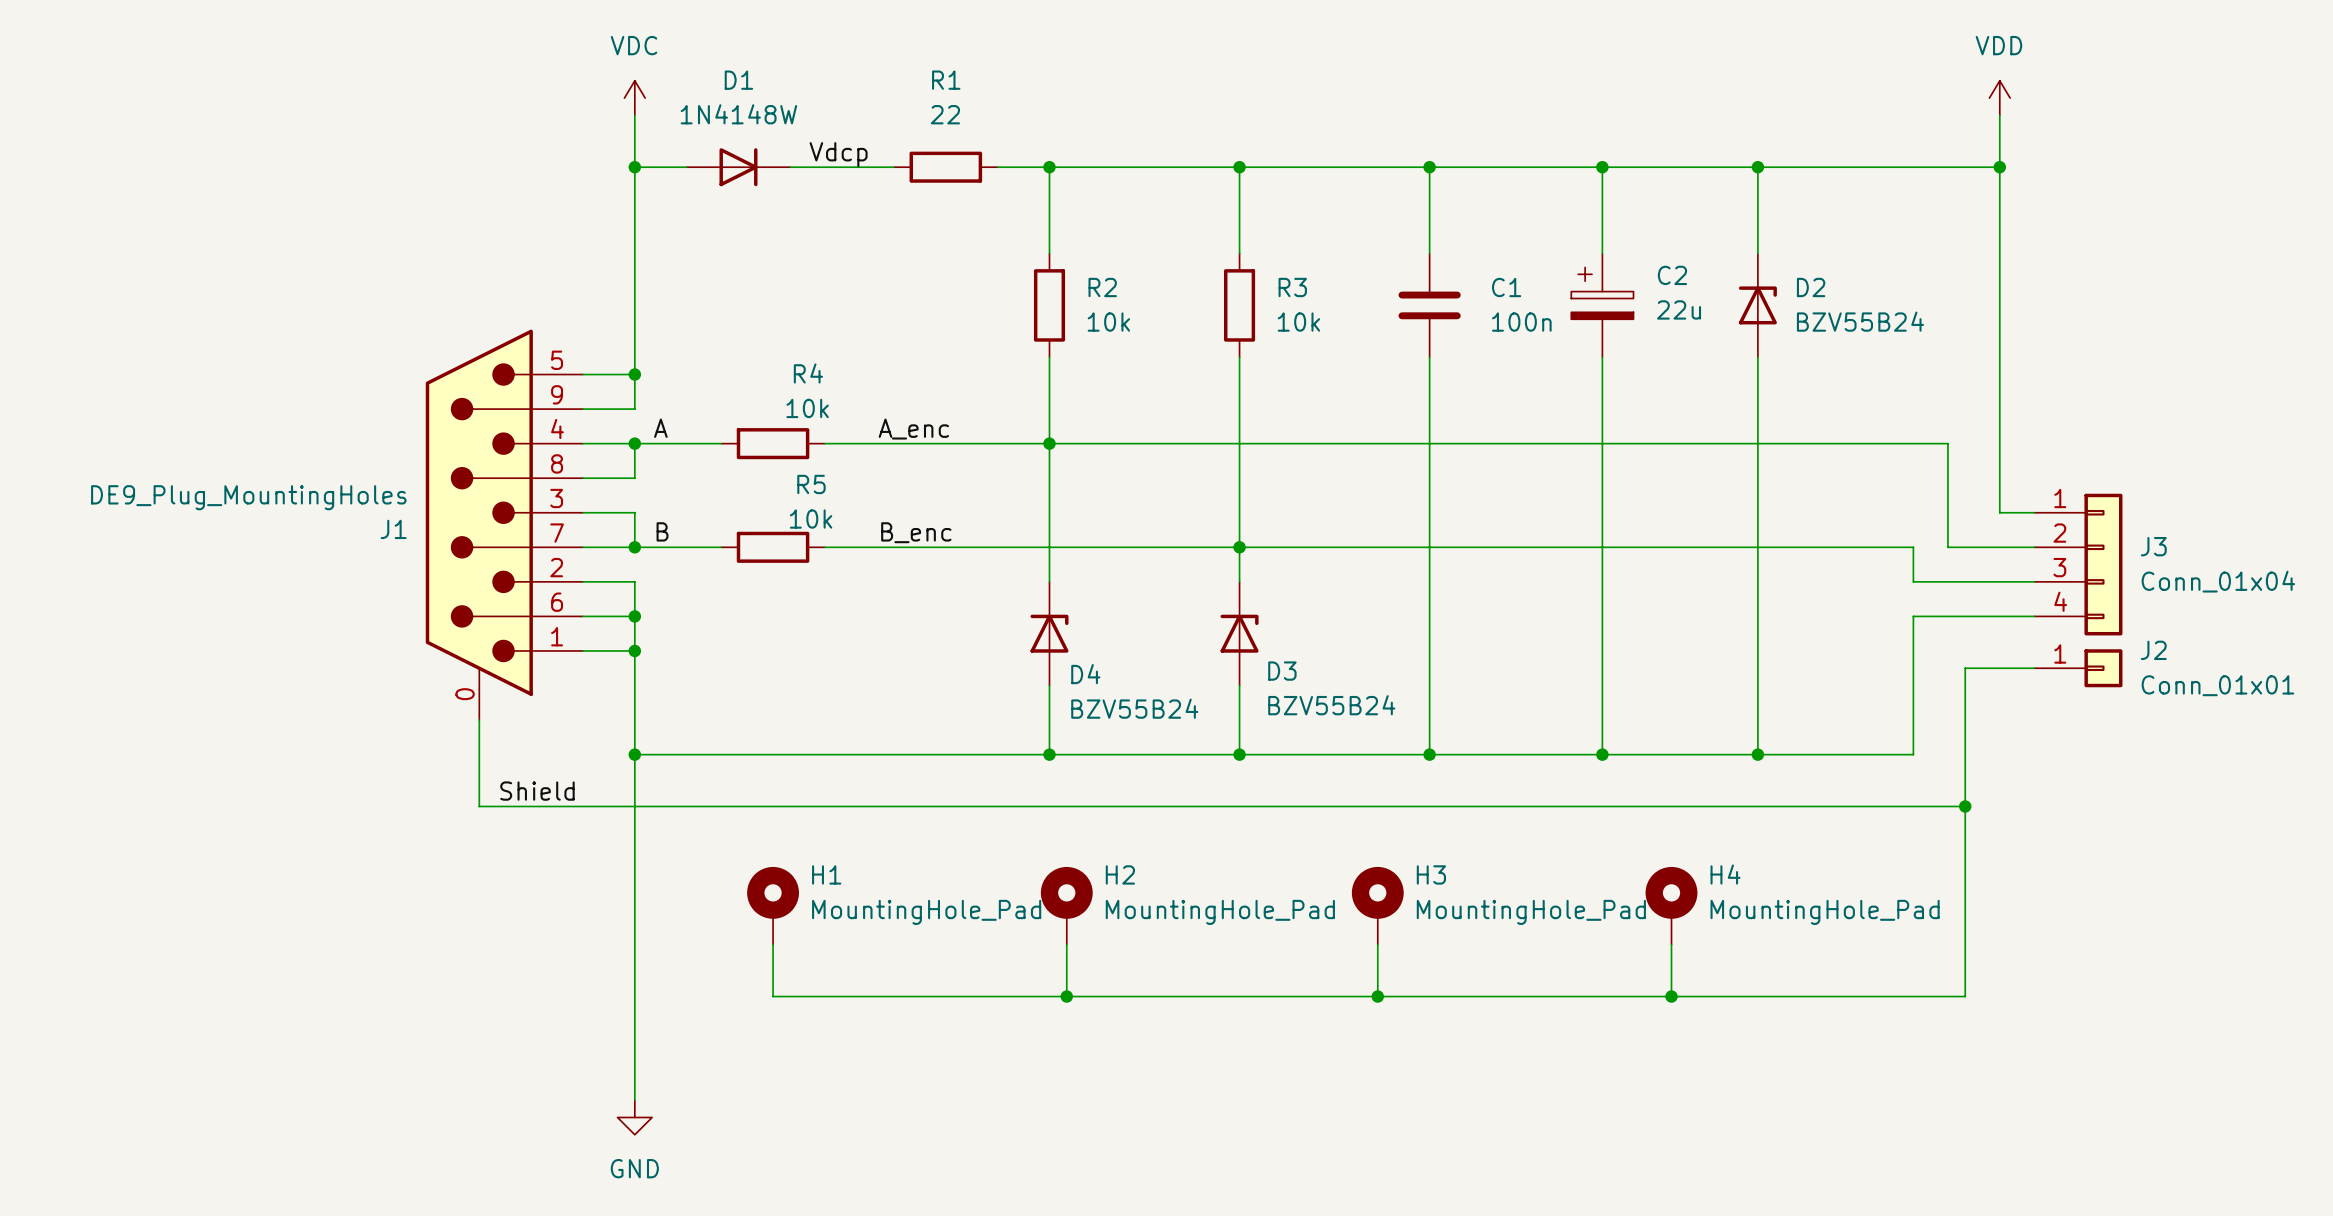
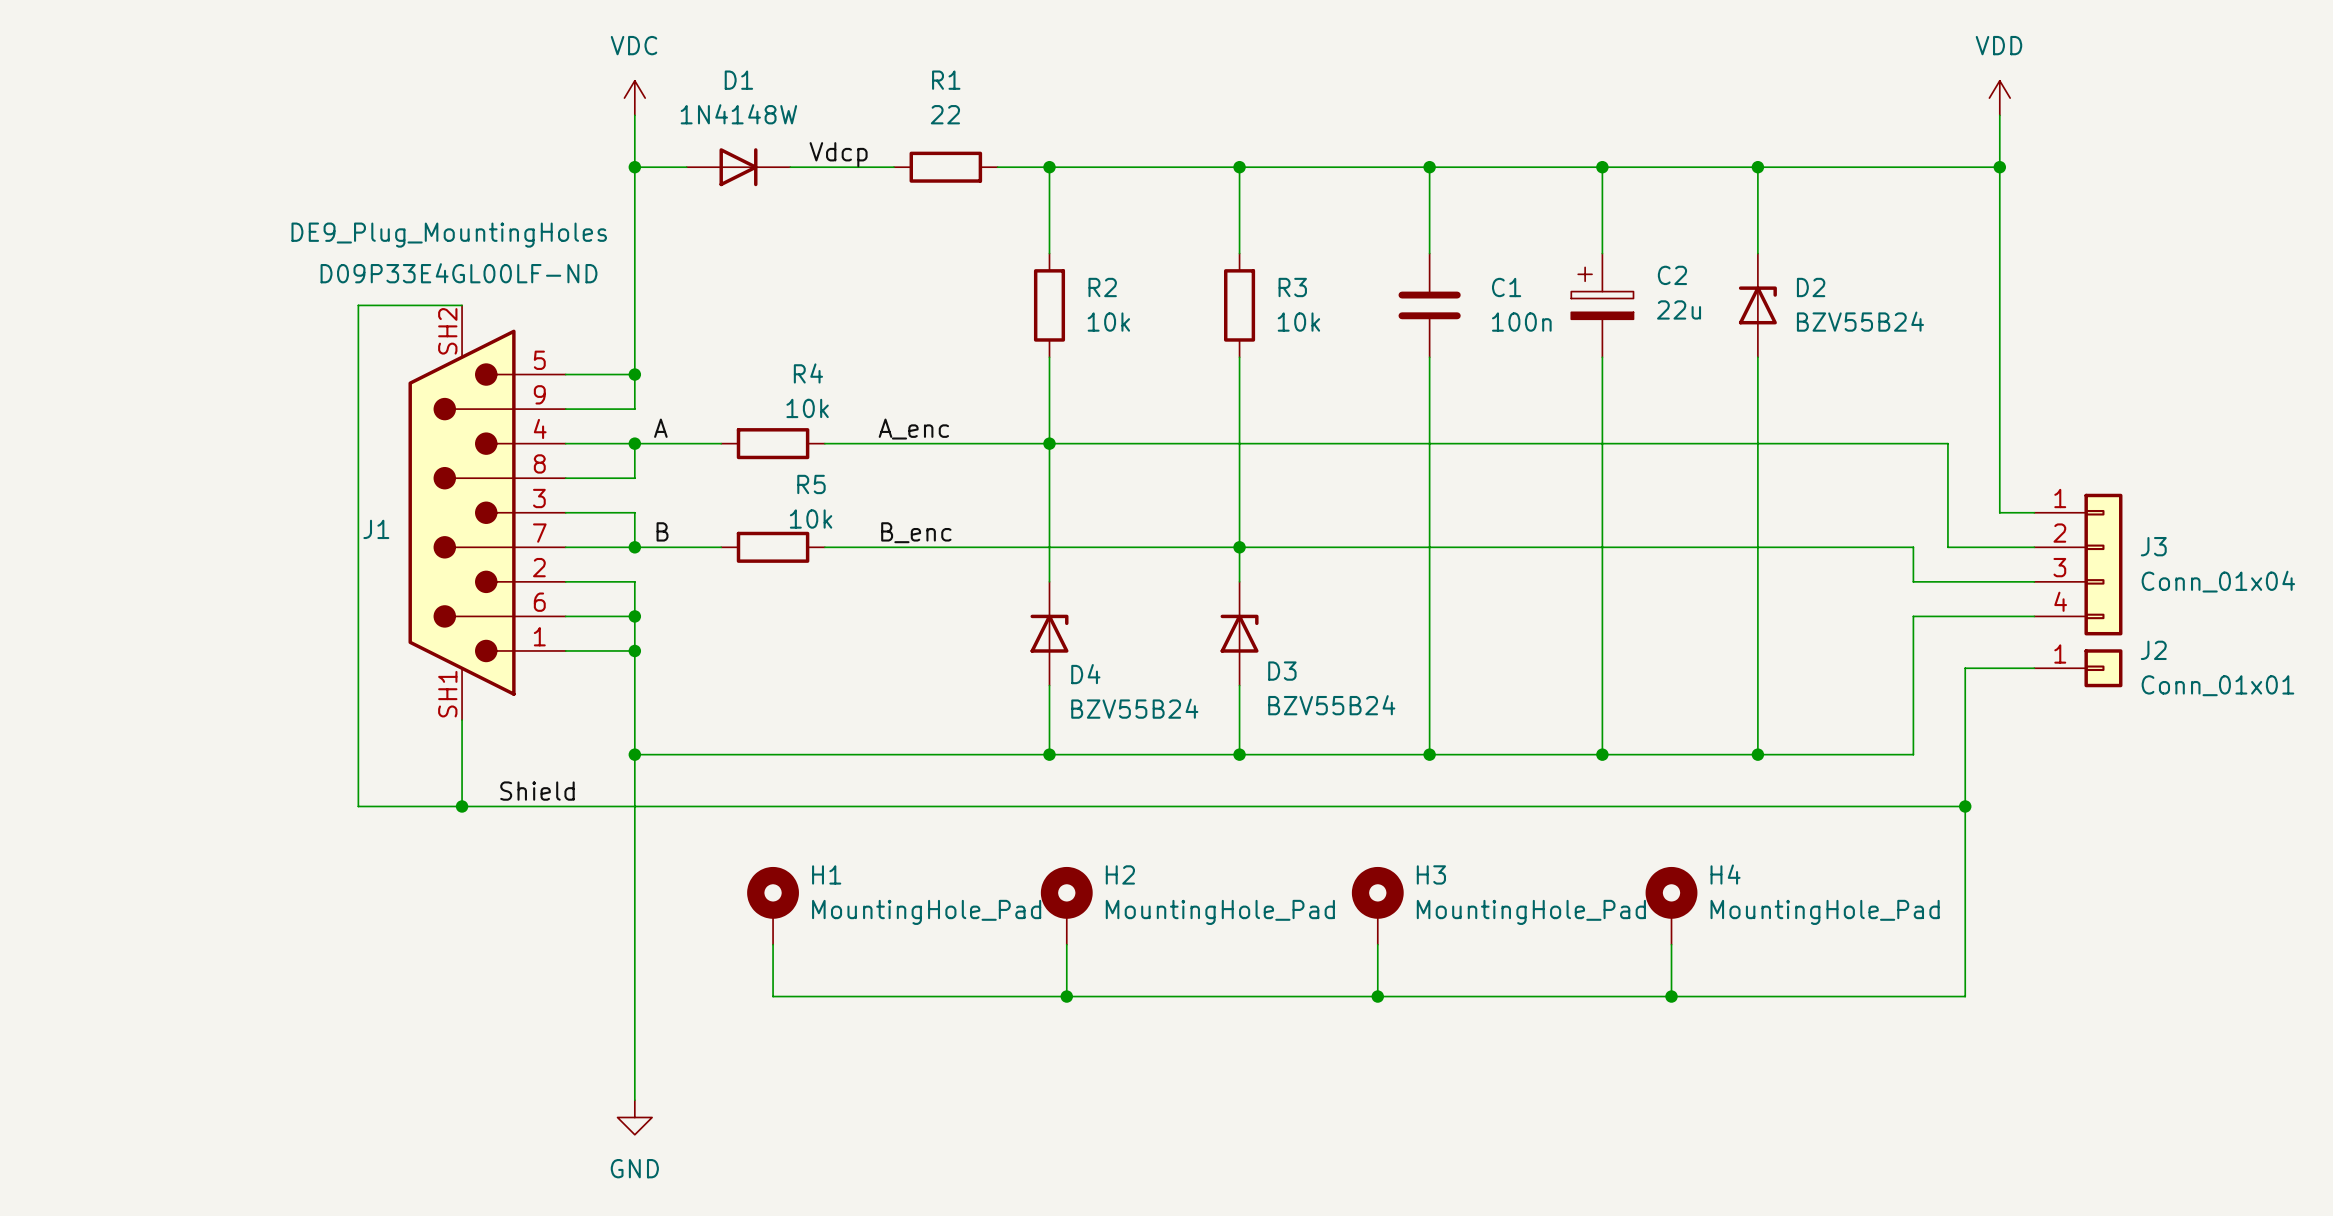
J1 text: none -> D09P33E4GL00LF-ND (459, 273)
J1 symbol: [425, 329, 583, 721] -> [408, 305, 566, 721]
J1 value position: DE9_Plug_MountingHoles (248, 497) -> DE9_Plug_MountingHoles (449, 235)
wire: none -> (462, 720) (462, 806)
wire: (479, 720) (479, 806) -> (462, 305) (358, 305) (358, 806) (479, 806)
junction: none -> (462, 806)

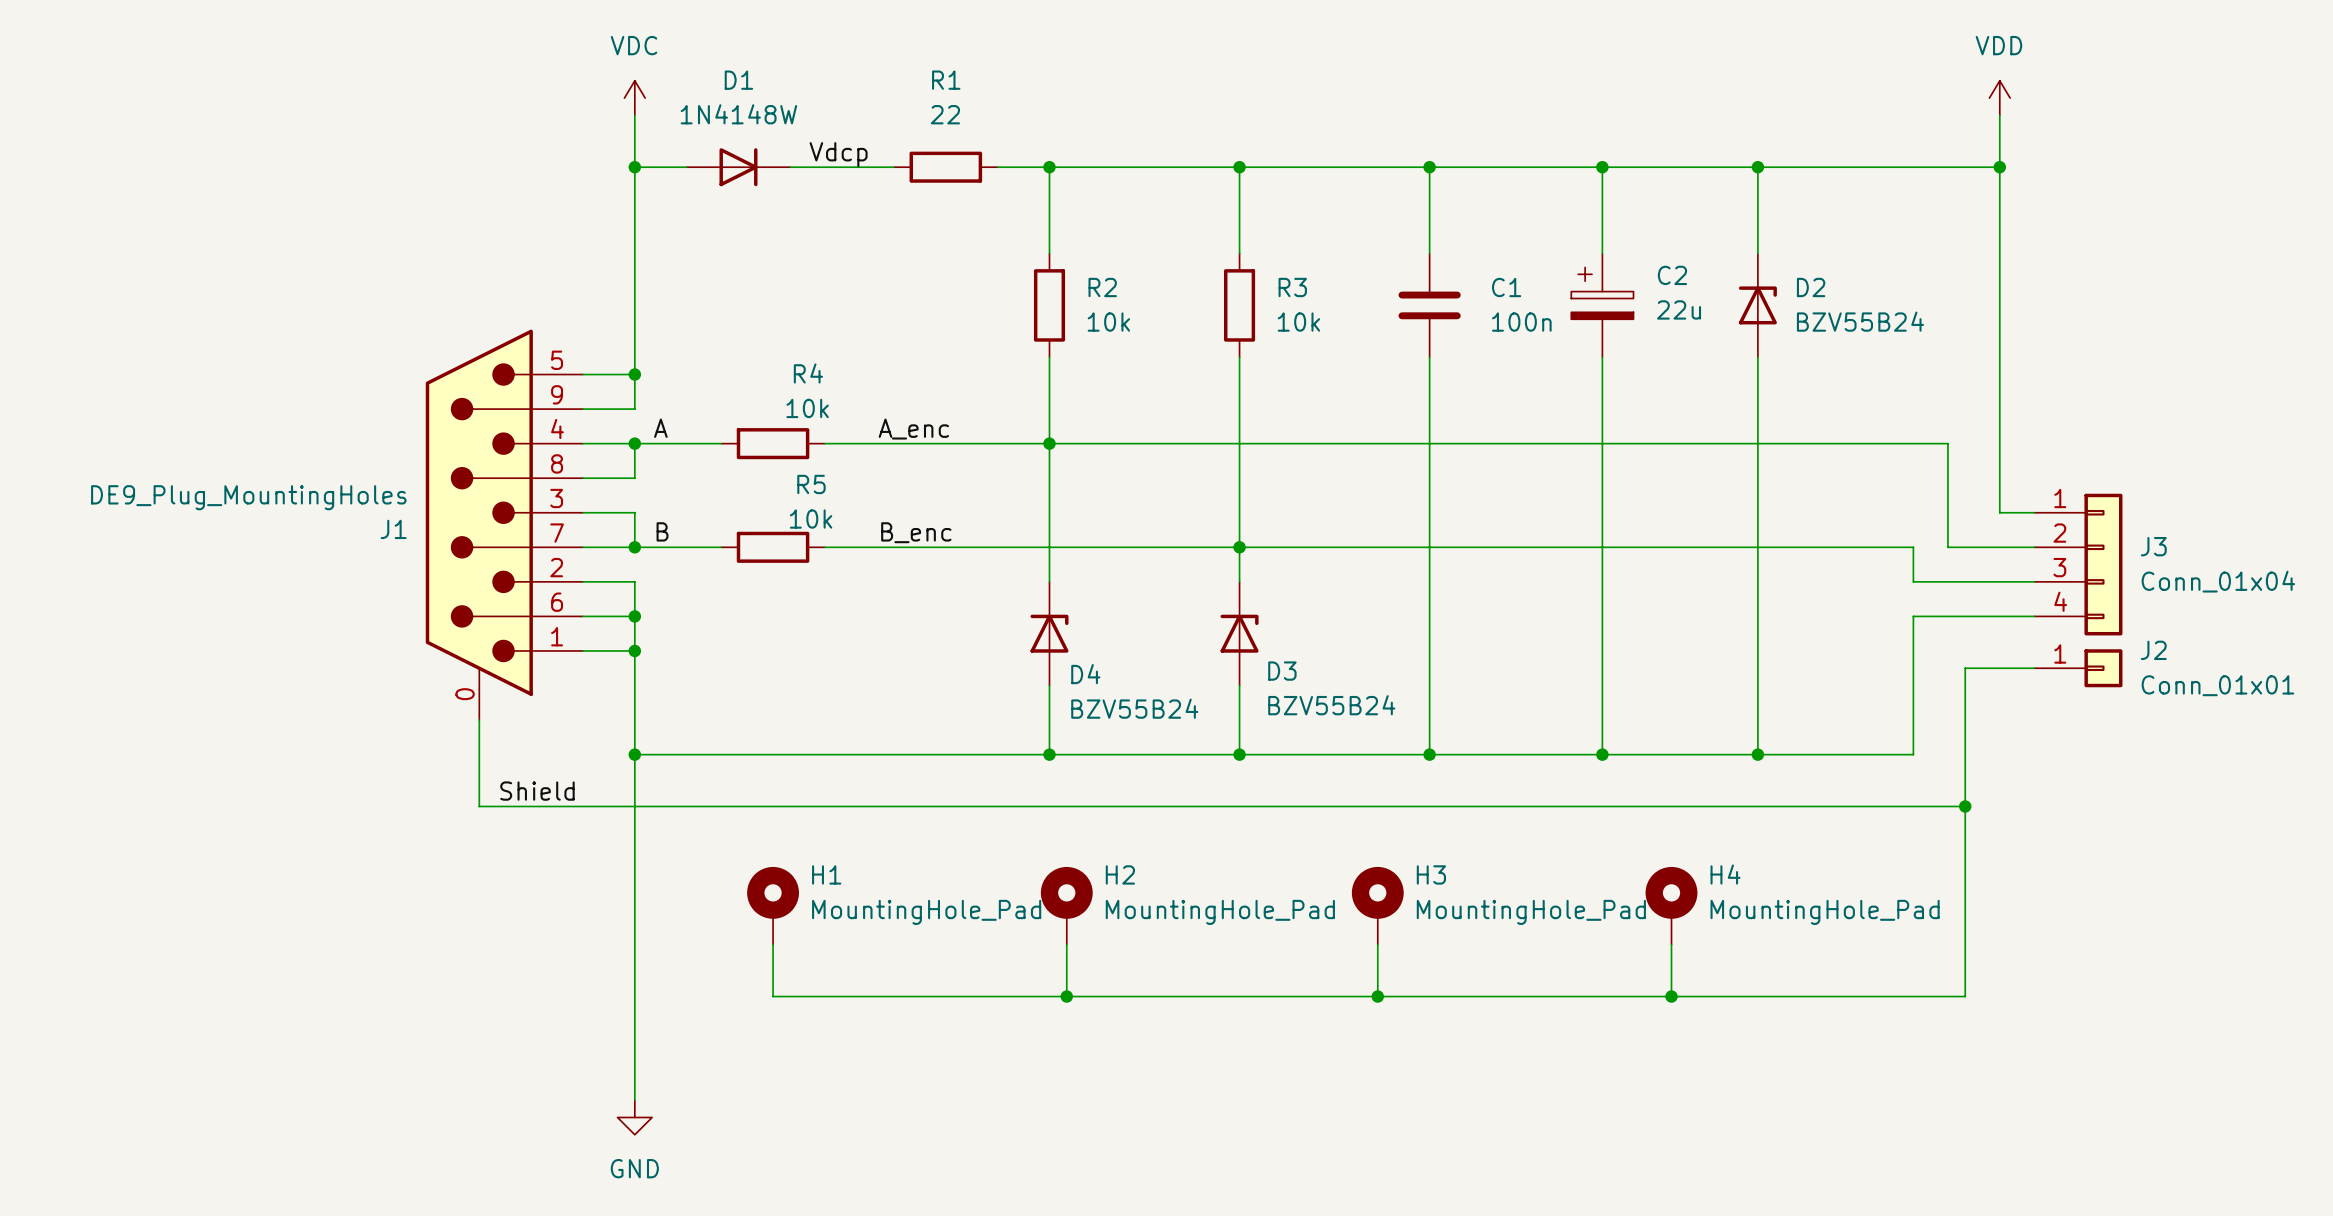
J1 value position: DE9_Plug_MountingHoles (449, 235) -> DE9_Plug_MountingHoles (248, 497)
J1 text: D09P33E4GL00LF-ND (459, 273) -> none
J1 symbol: [408, 305, 566, 721] -> [425, 329, 583, 721]
wire: (462, 305) (358, 305) (358, 806) (479, 806) -> (479, 720) (479, 806)
wire: (462, 720) (462, 806) -> none
junction: (462, 806) -> none

